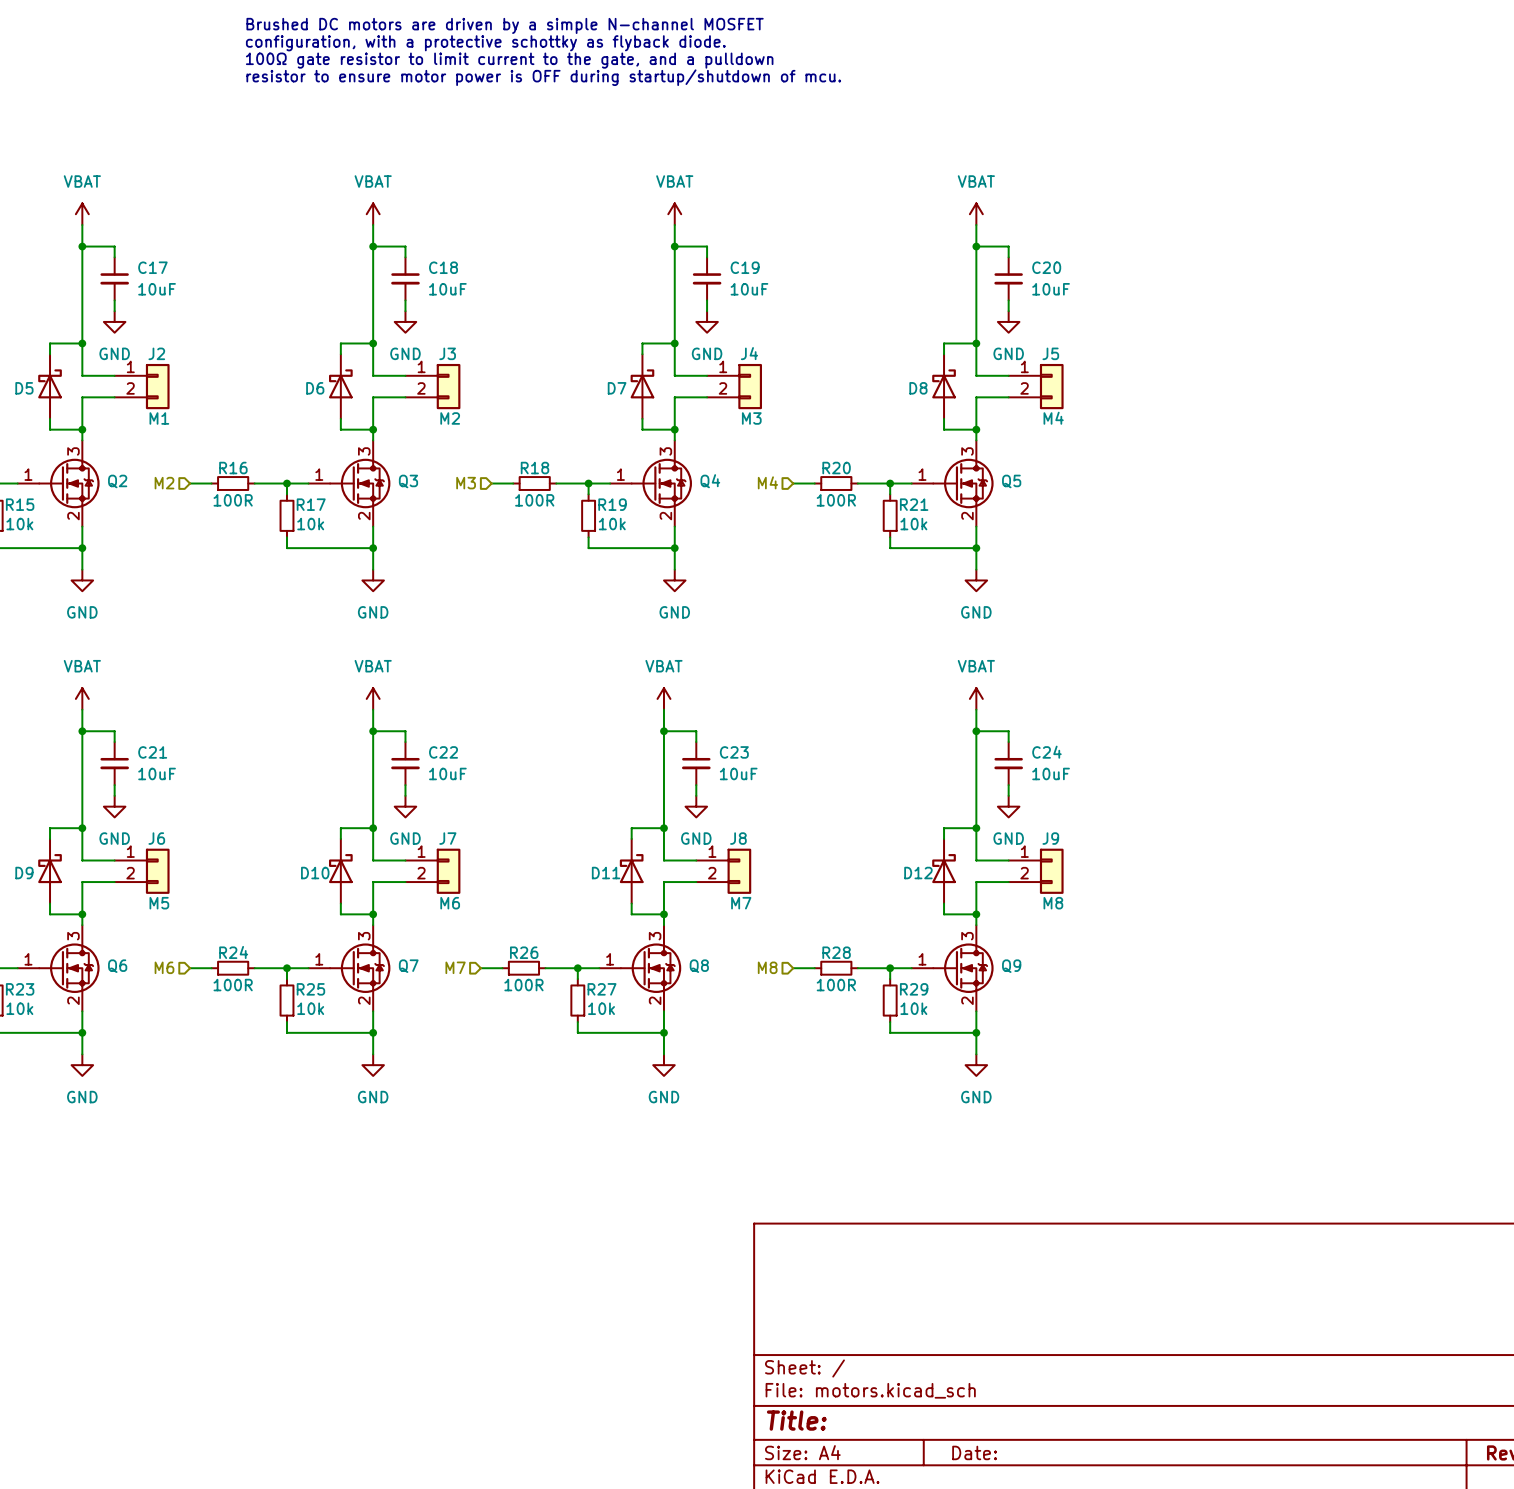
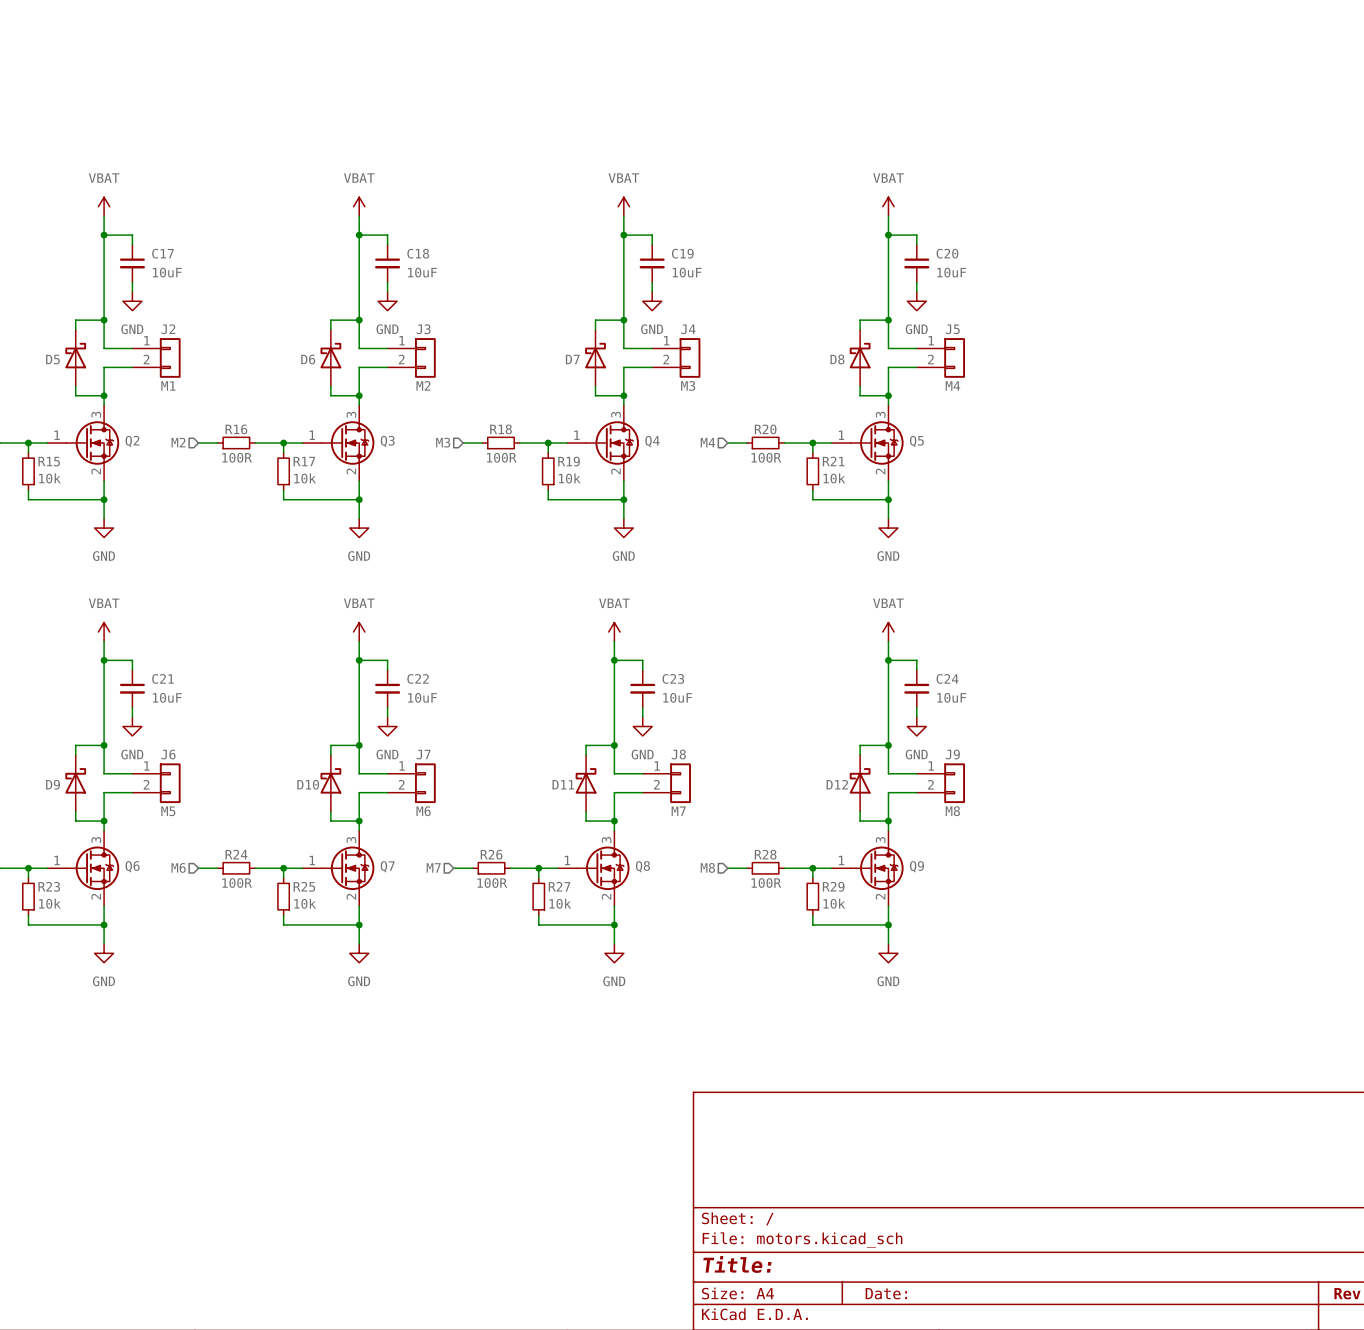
text: Brushed DC motors are driven by a simple N-channel MOSFET (505, 25) -> none
text: configuration, with a protective schottky as flyback diode. (485, 43) -> none
text: 100Ω gate resistor to limit current to the gate, and a pulldown (509, 60) -> none
text: resistor to ensure motor power is OFF during startup/shutdown of mcu. (543, 77) -> none

